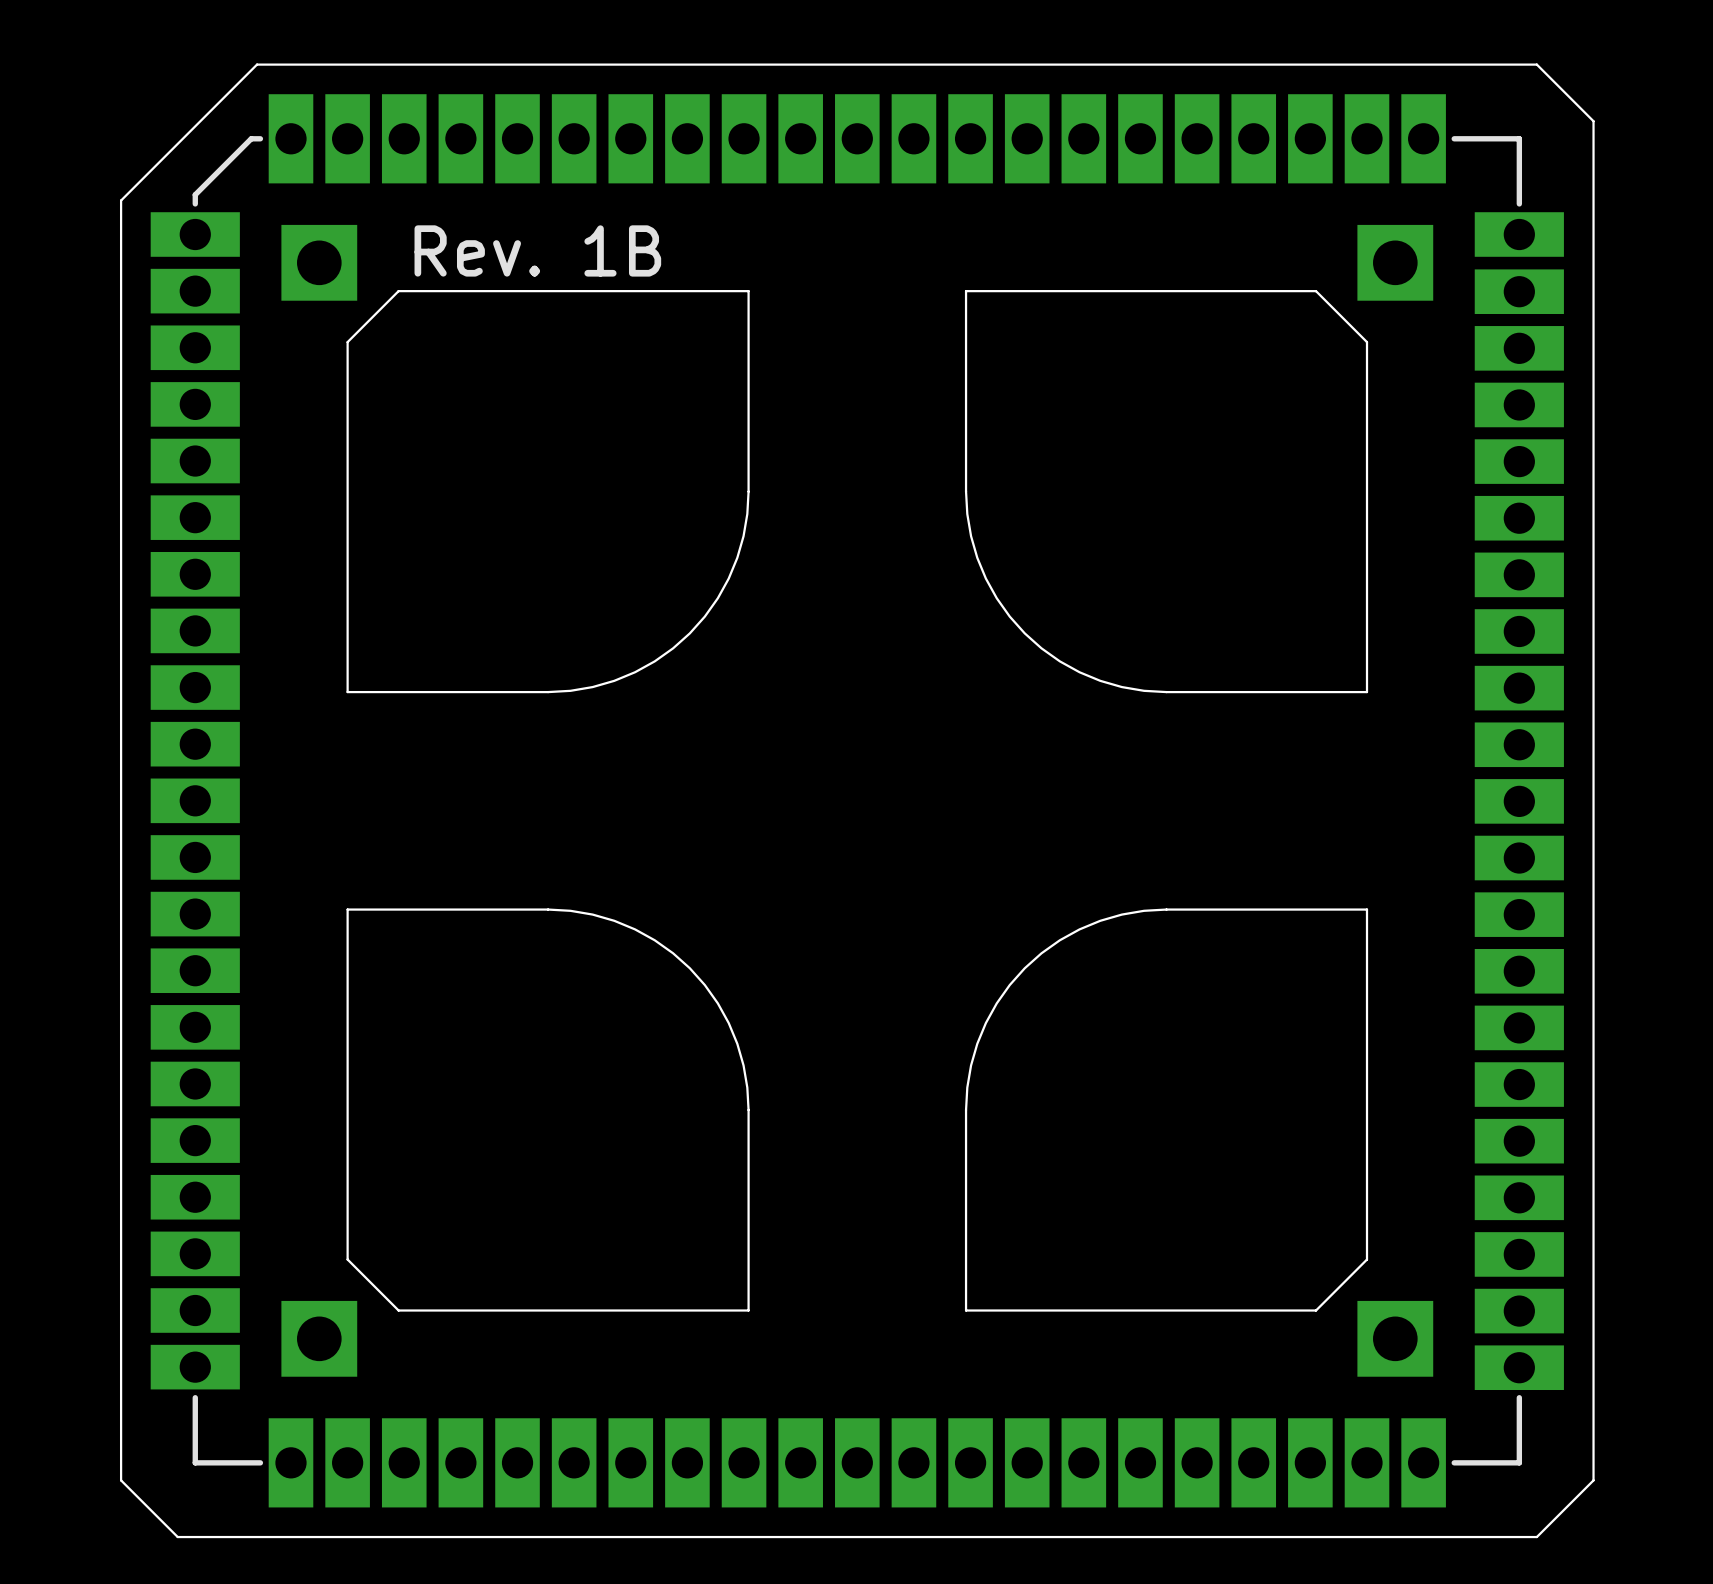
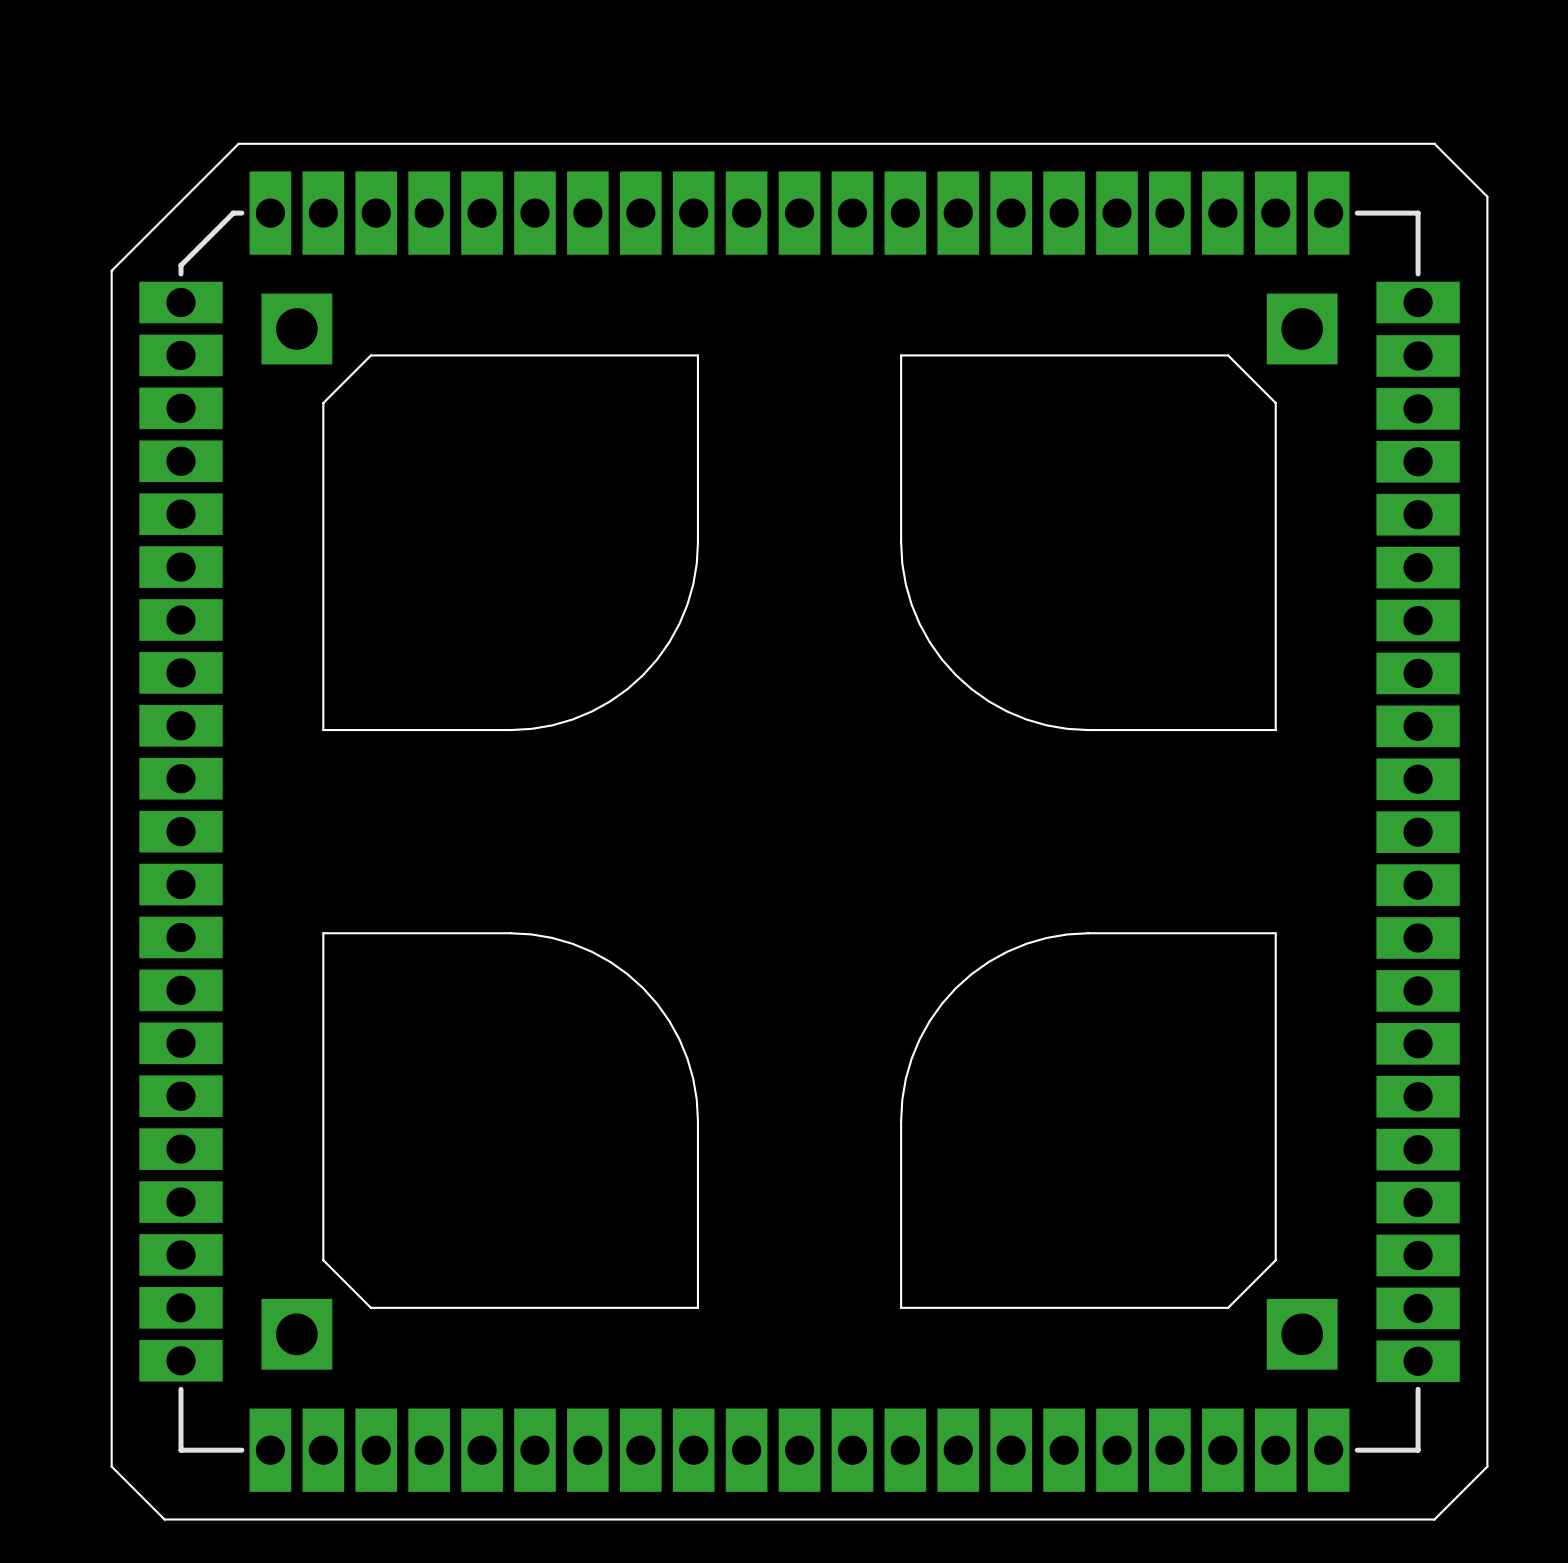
text: Rev. 1B (537, 250) -> none

